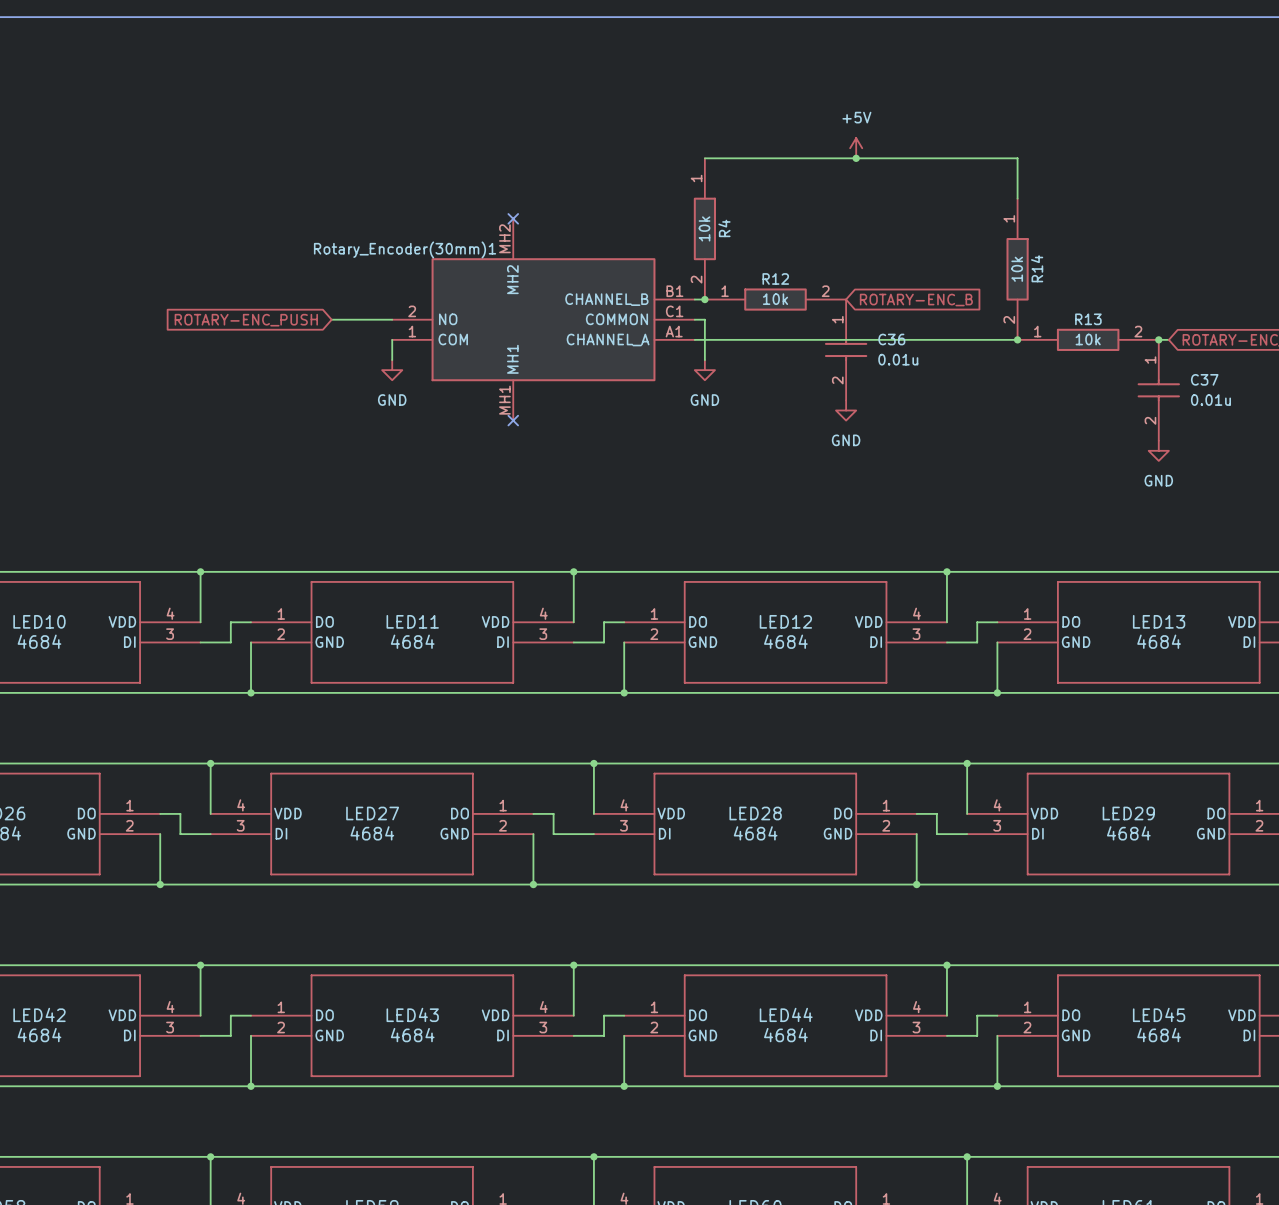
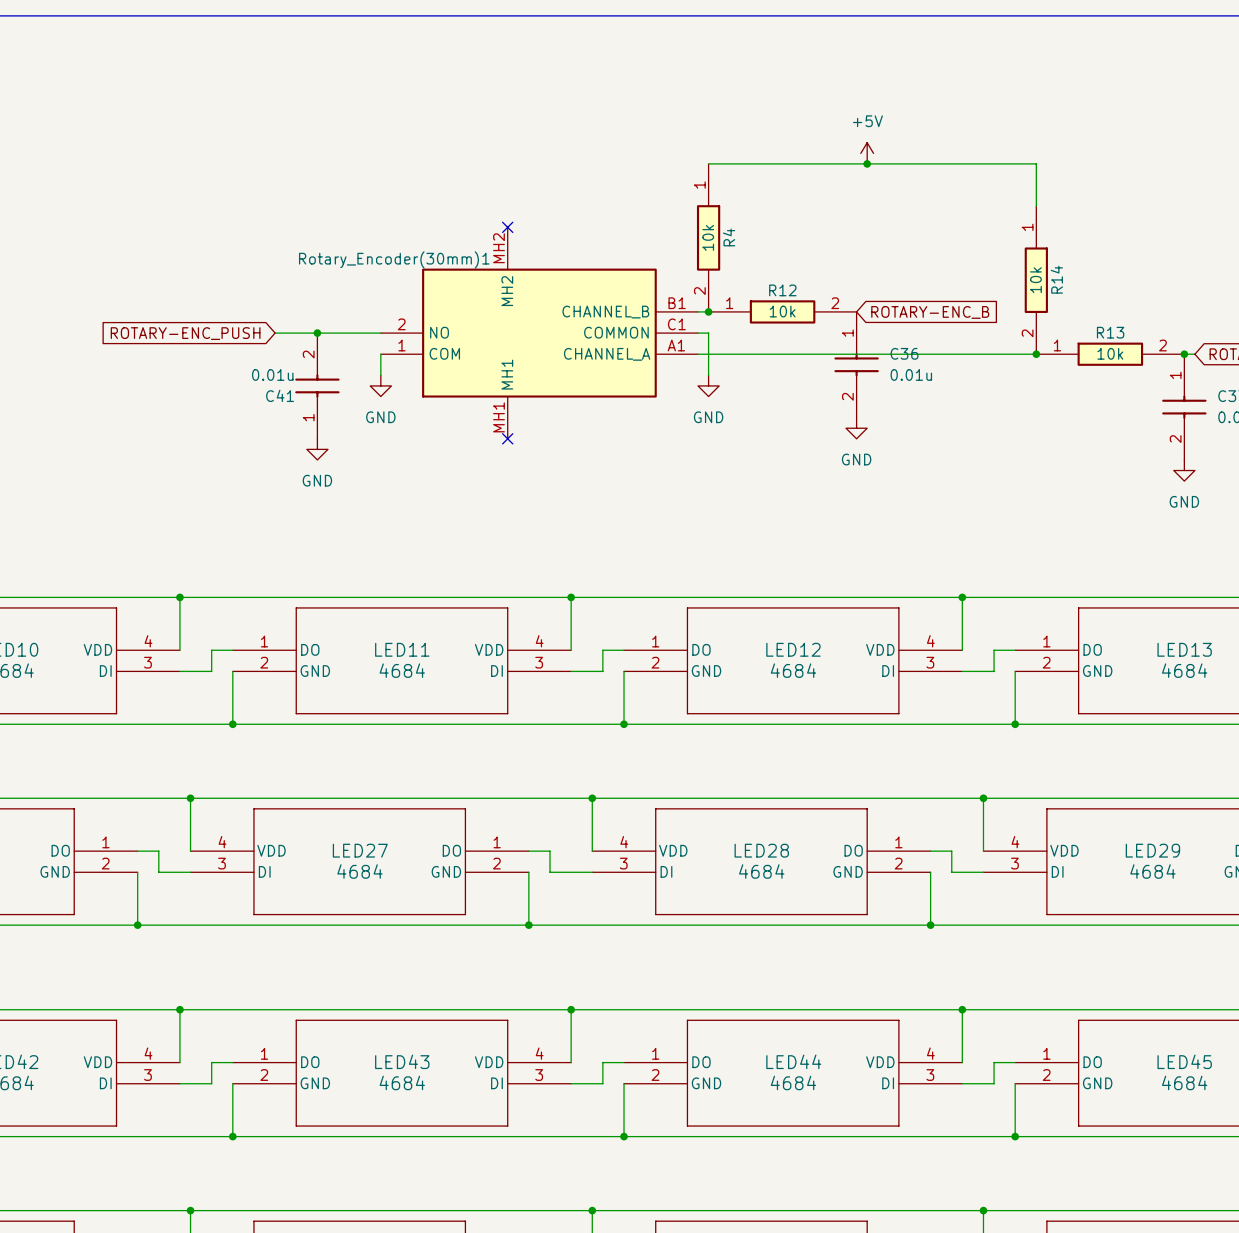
wire: none -> (275, 333) (317, 333)
junction: none -> (317, 333)
global label position: ROTARY-ENC_PUSH (246, 320) -> ROTARY-ENC_PUSH (185, 333)
C41: none -> 0.01u (317, 385)
power symbol: none -> GND (317, 449)

